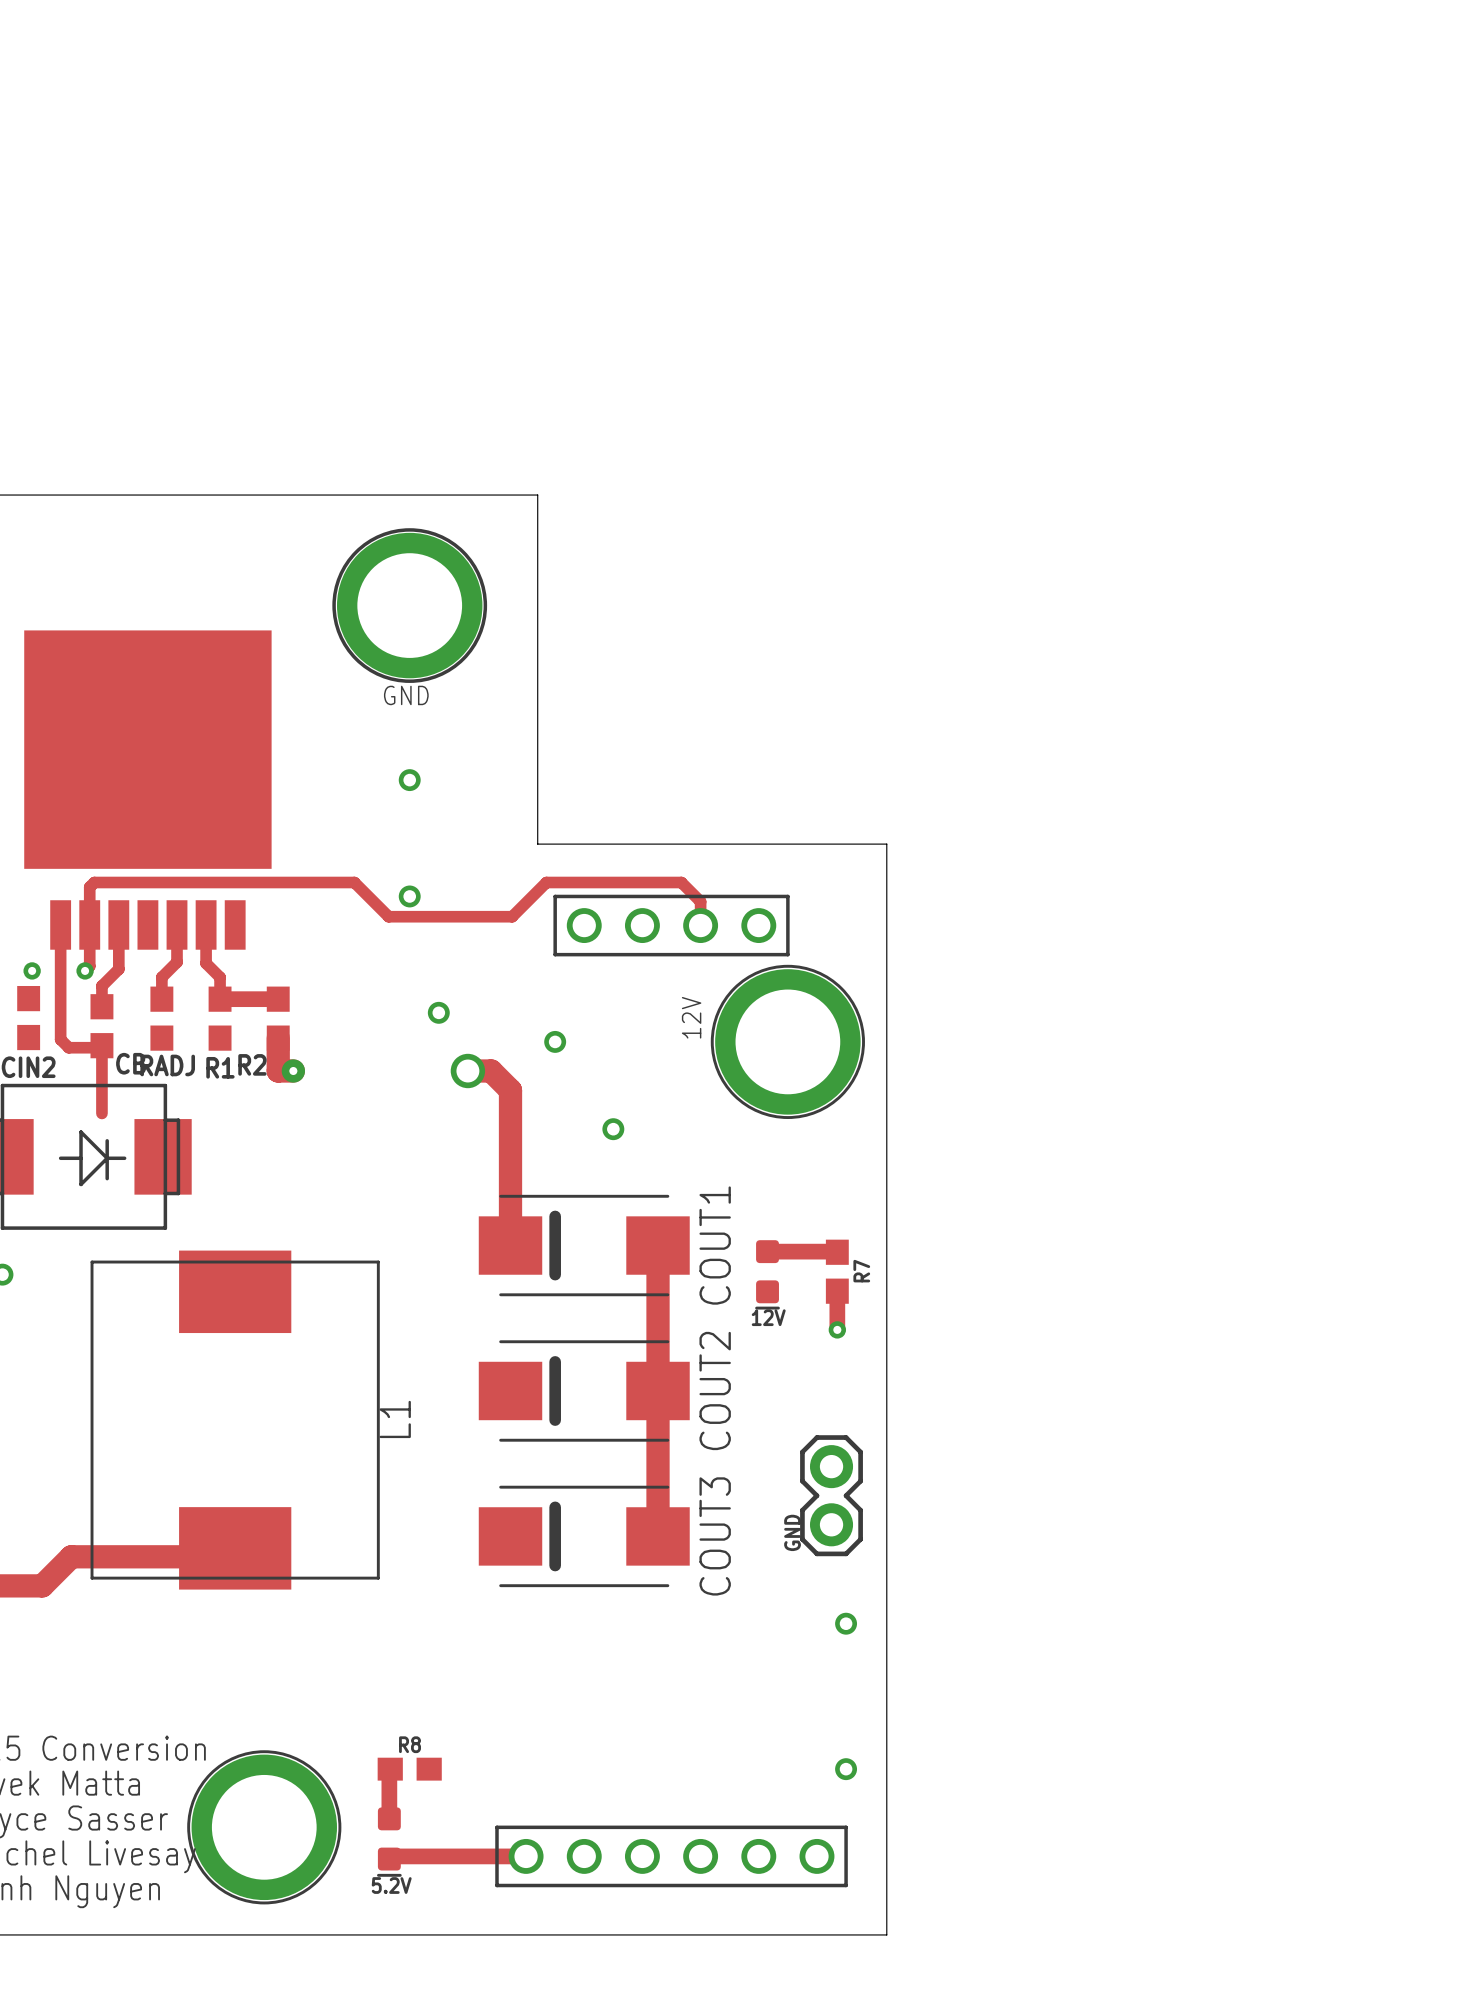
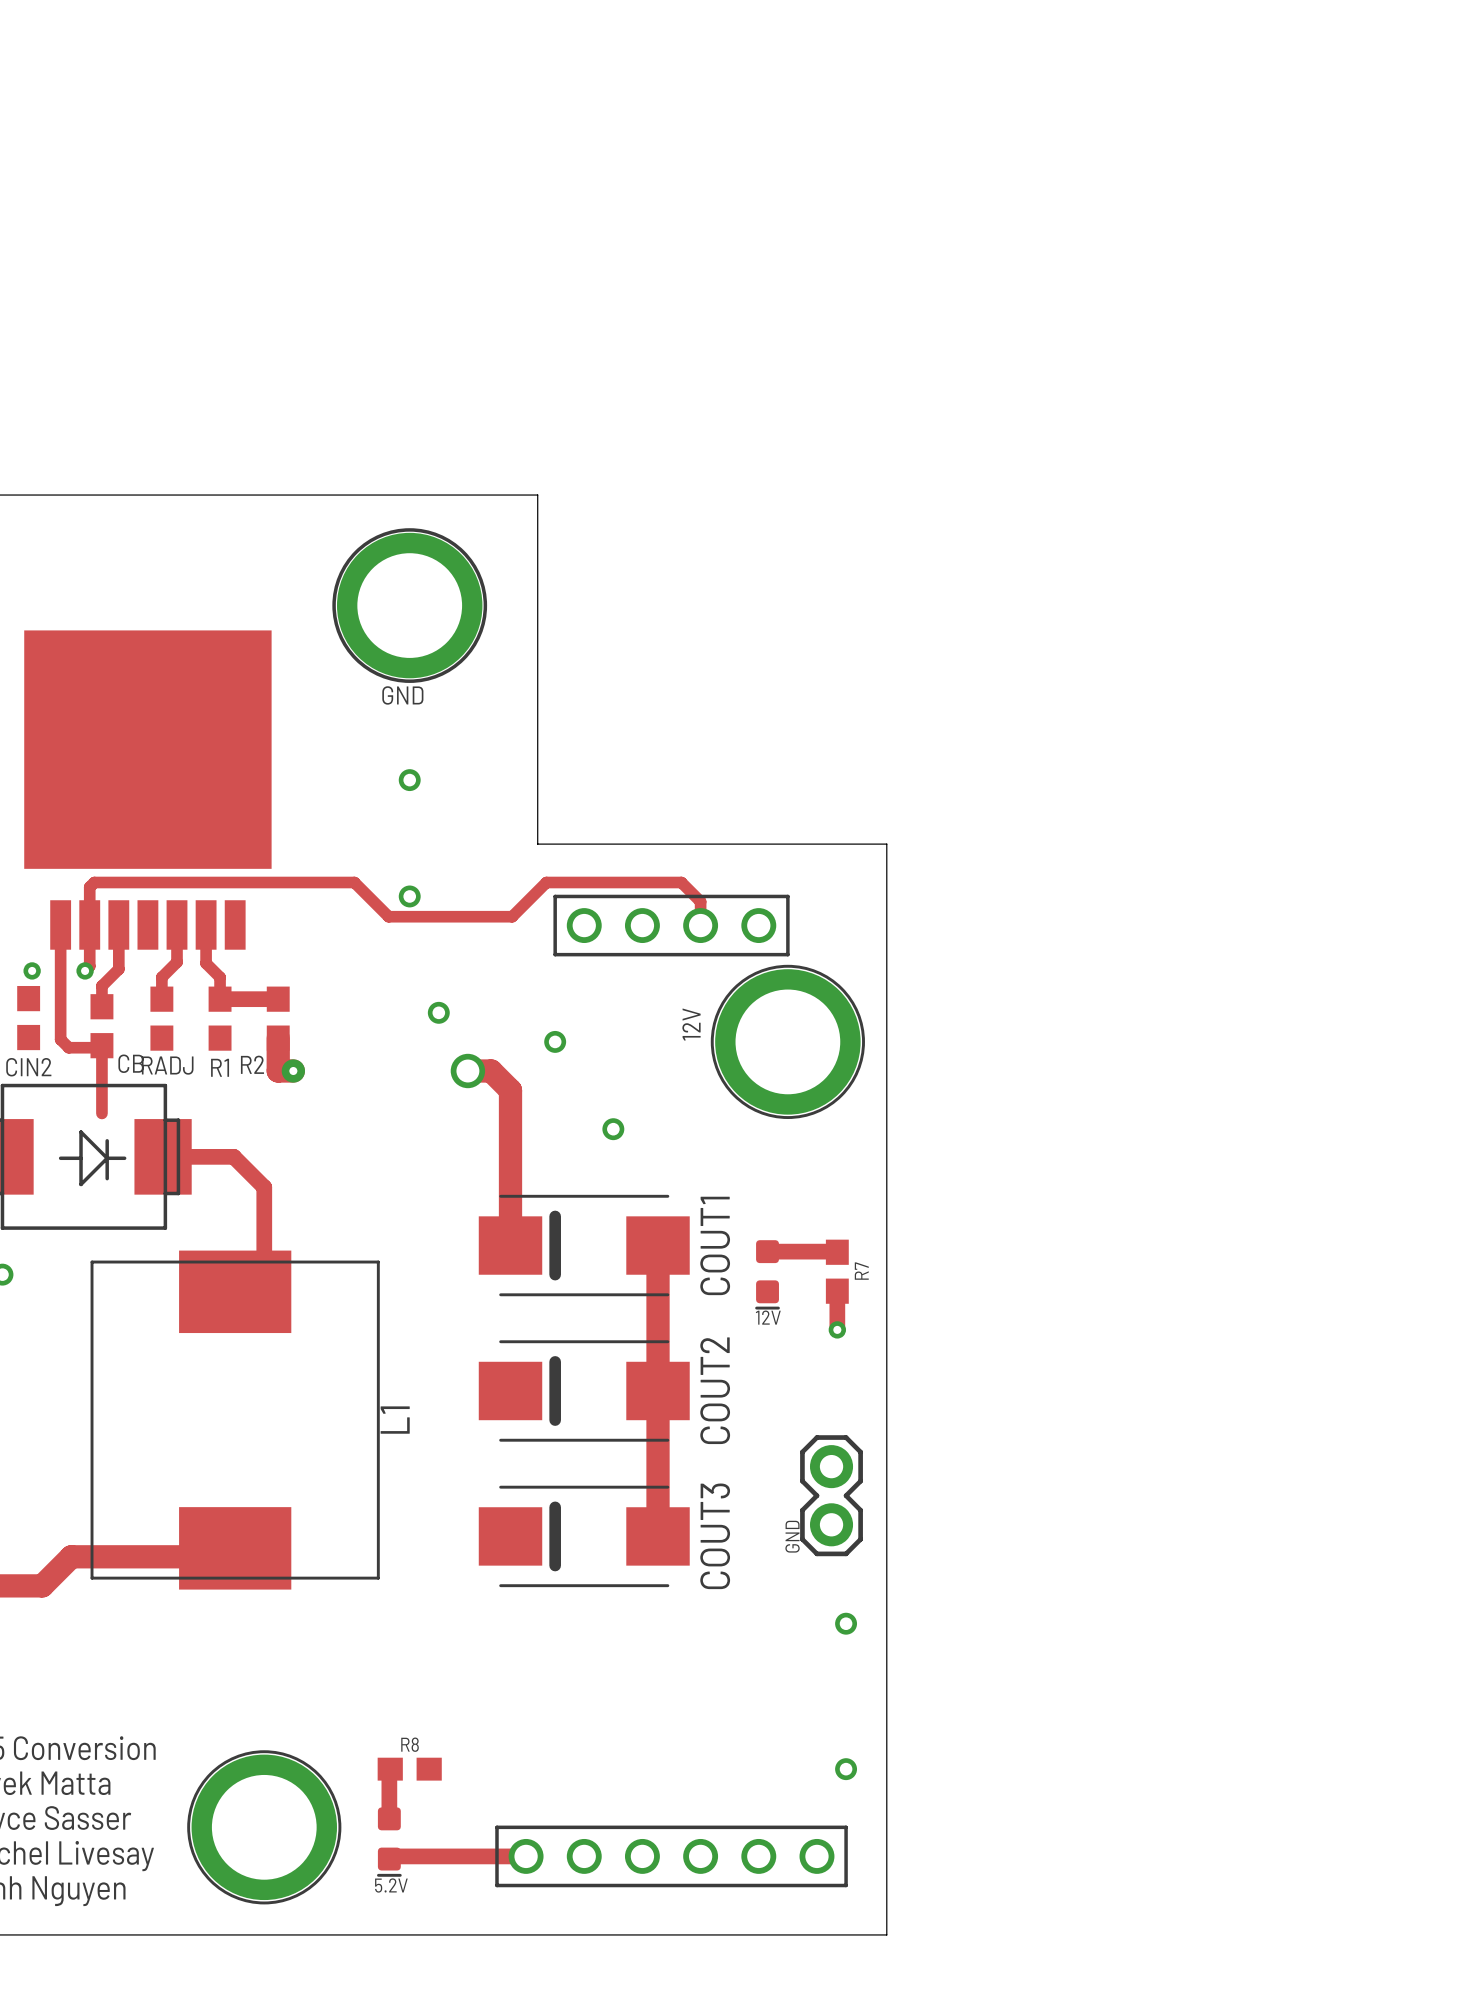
track: none -> (163, 1156) (233, 1156) (264, 1187) (264, 1262) (235, 1291)

